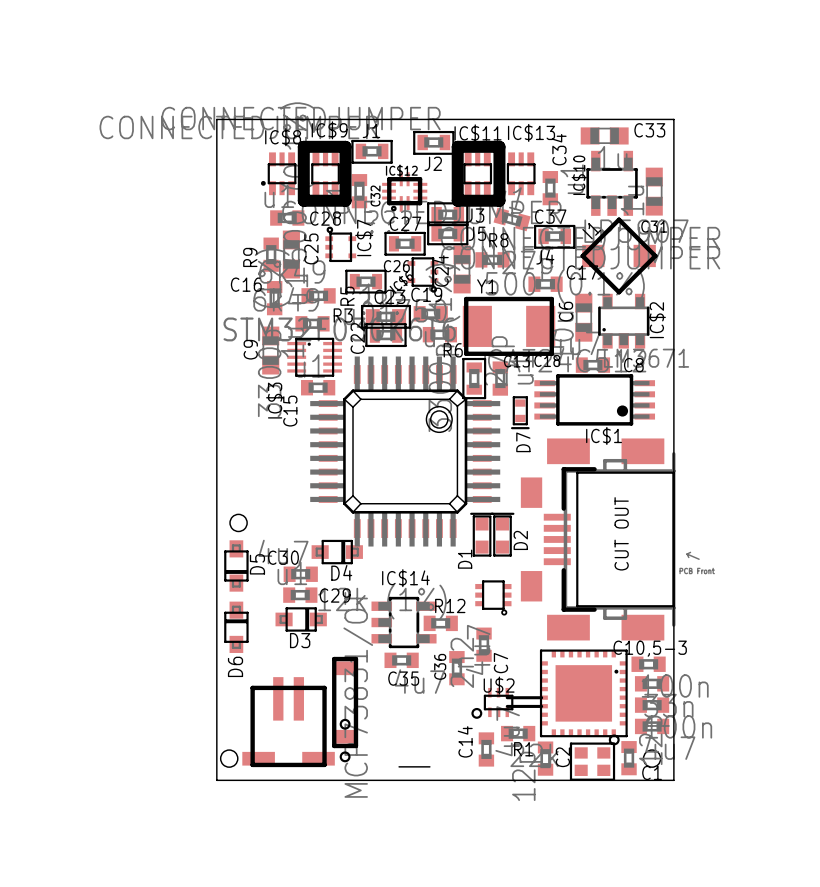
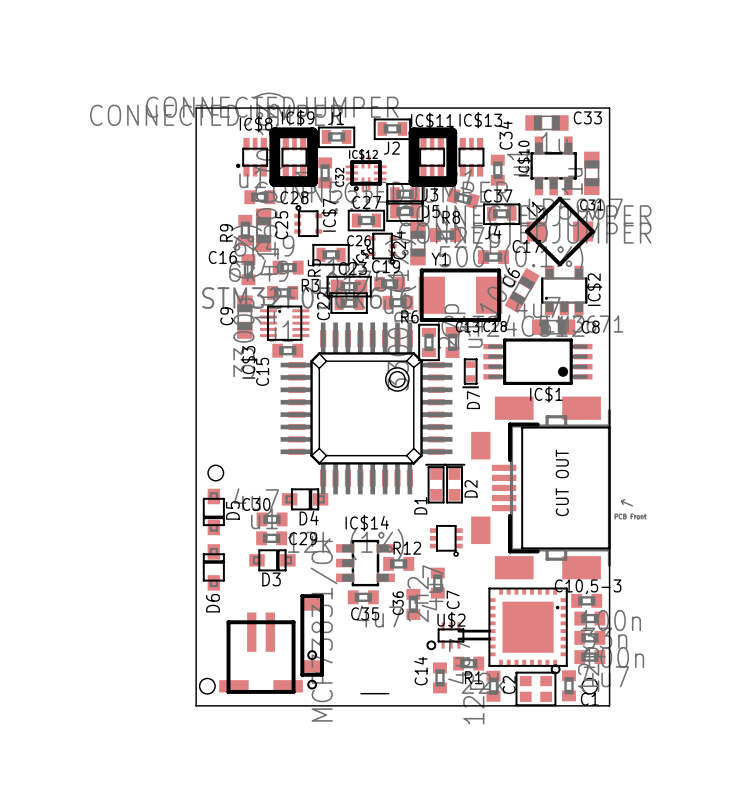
C6 rotation: 0° (583, 317) -> 30° clockwise (522, 290)
C8 footprint: [575, 357, 611, 373] -> [531, 319, 576, 335]

